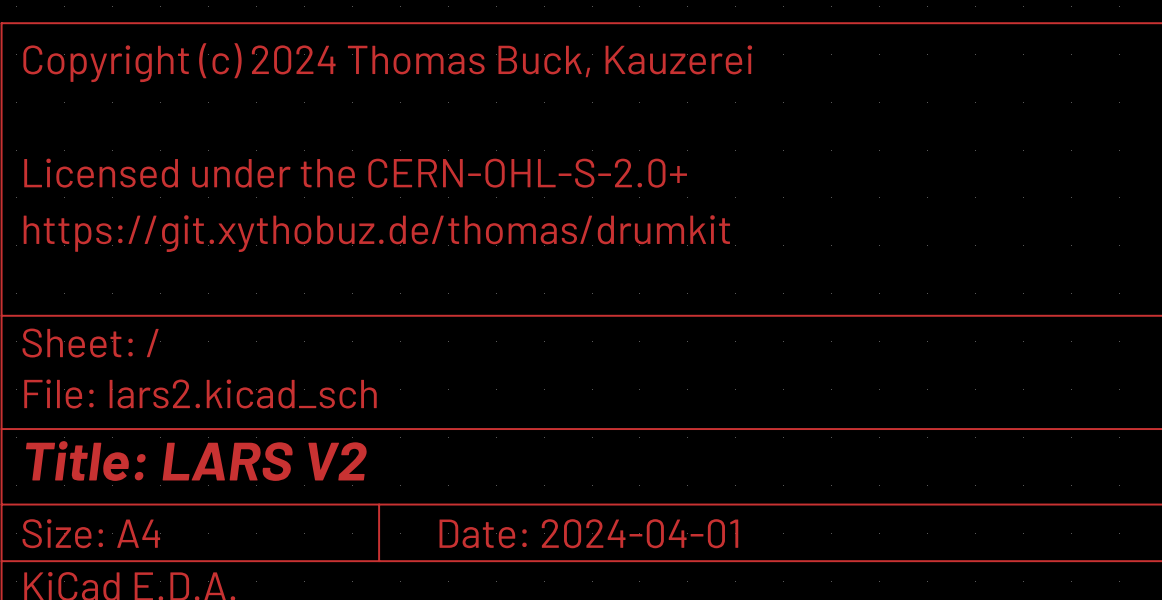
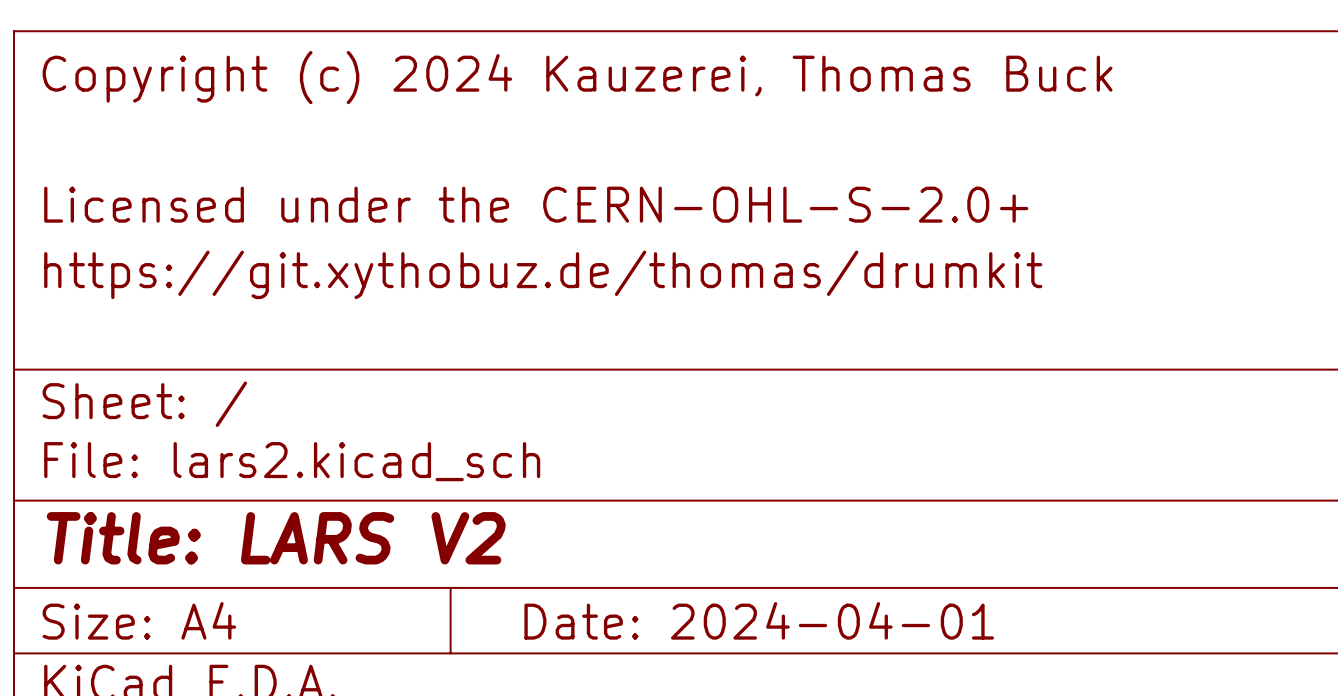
title block: Copyright (c) 2024 Thomas Buck, Kauzerei (387, 62) -> Copyright (c) 2024 Kauzerei, Thomas Buck (577, 77)

